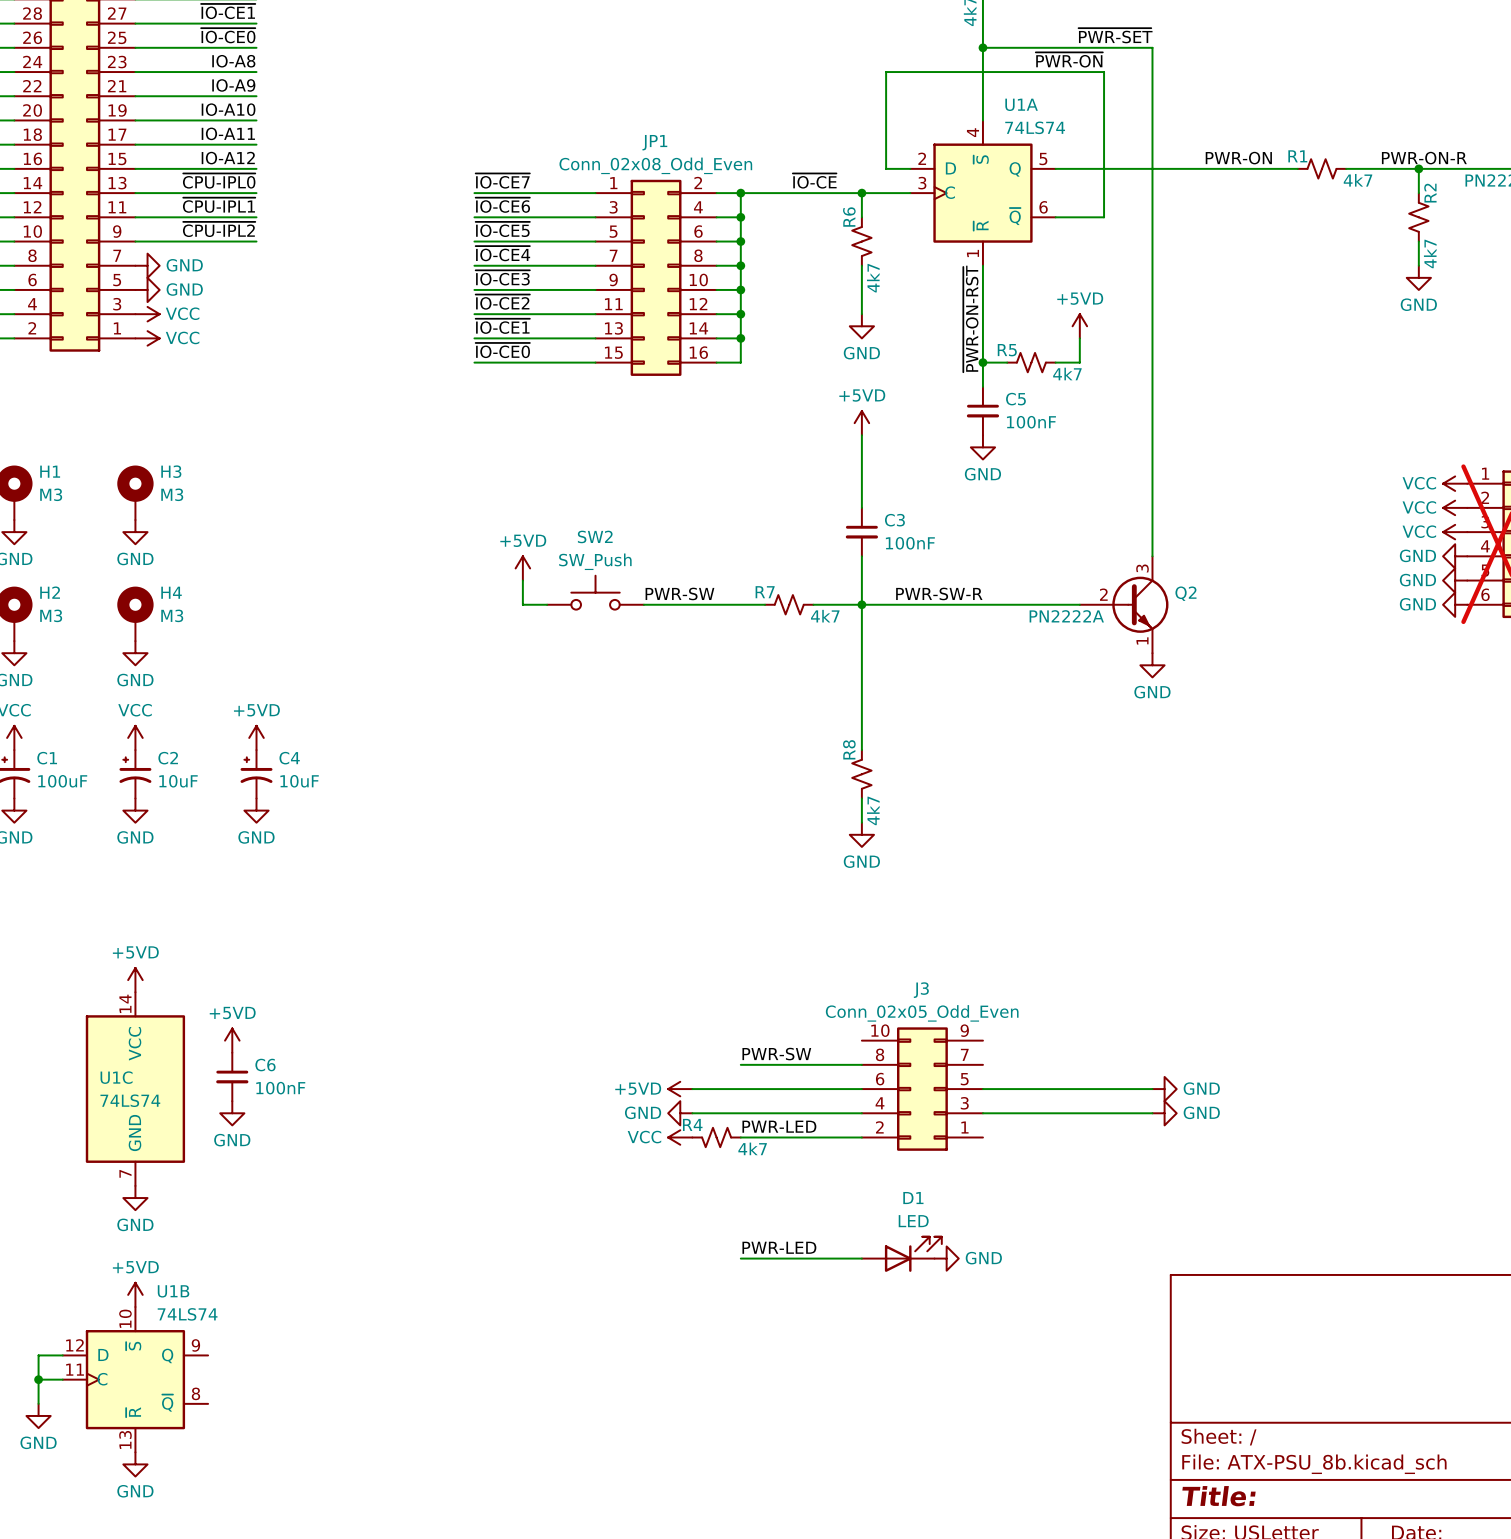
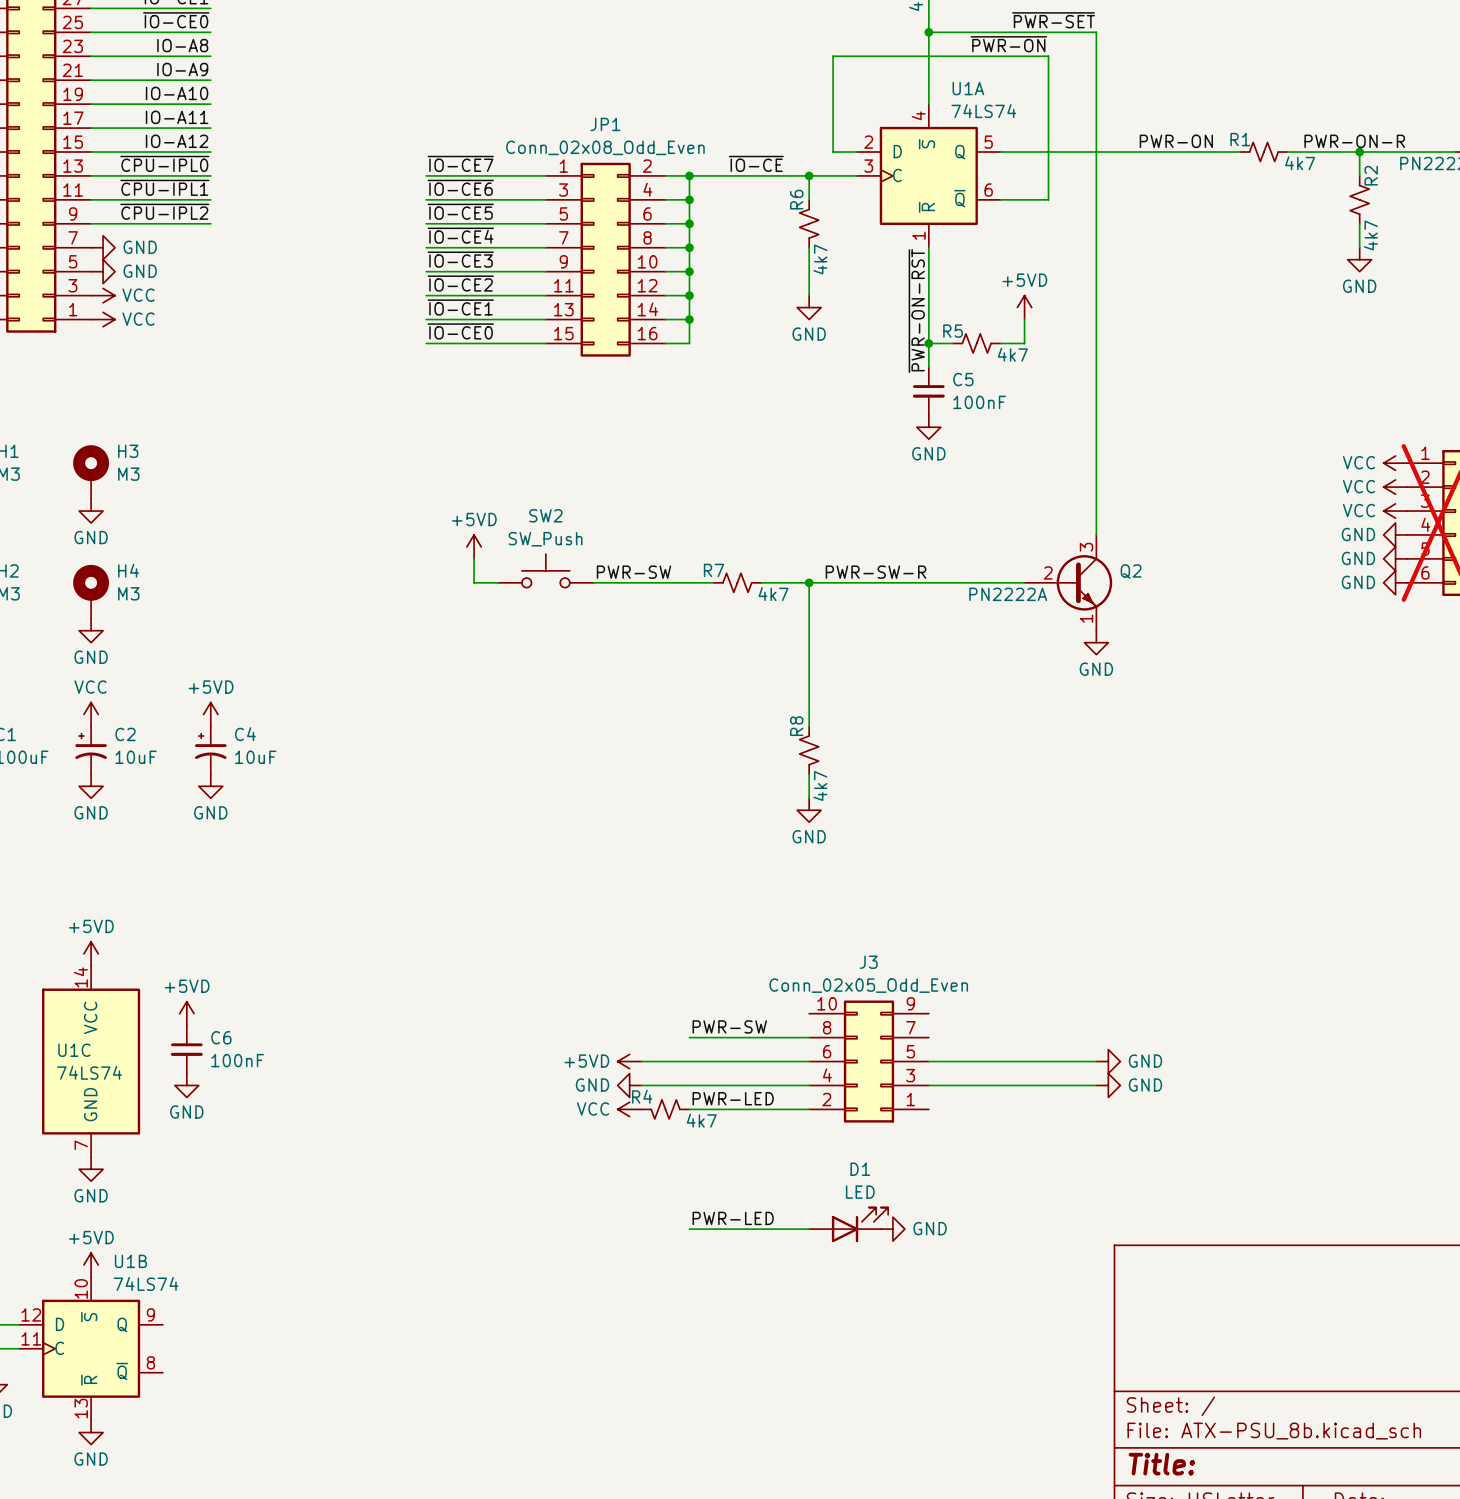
power symbol: +5VD (861, 423) -> none
wire: (861, 435) (861, 507) -> none
C3: 100nF (861, 532) -> none
wire: (861, 556) (861, 604) -> none

